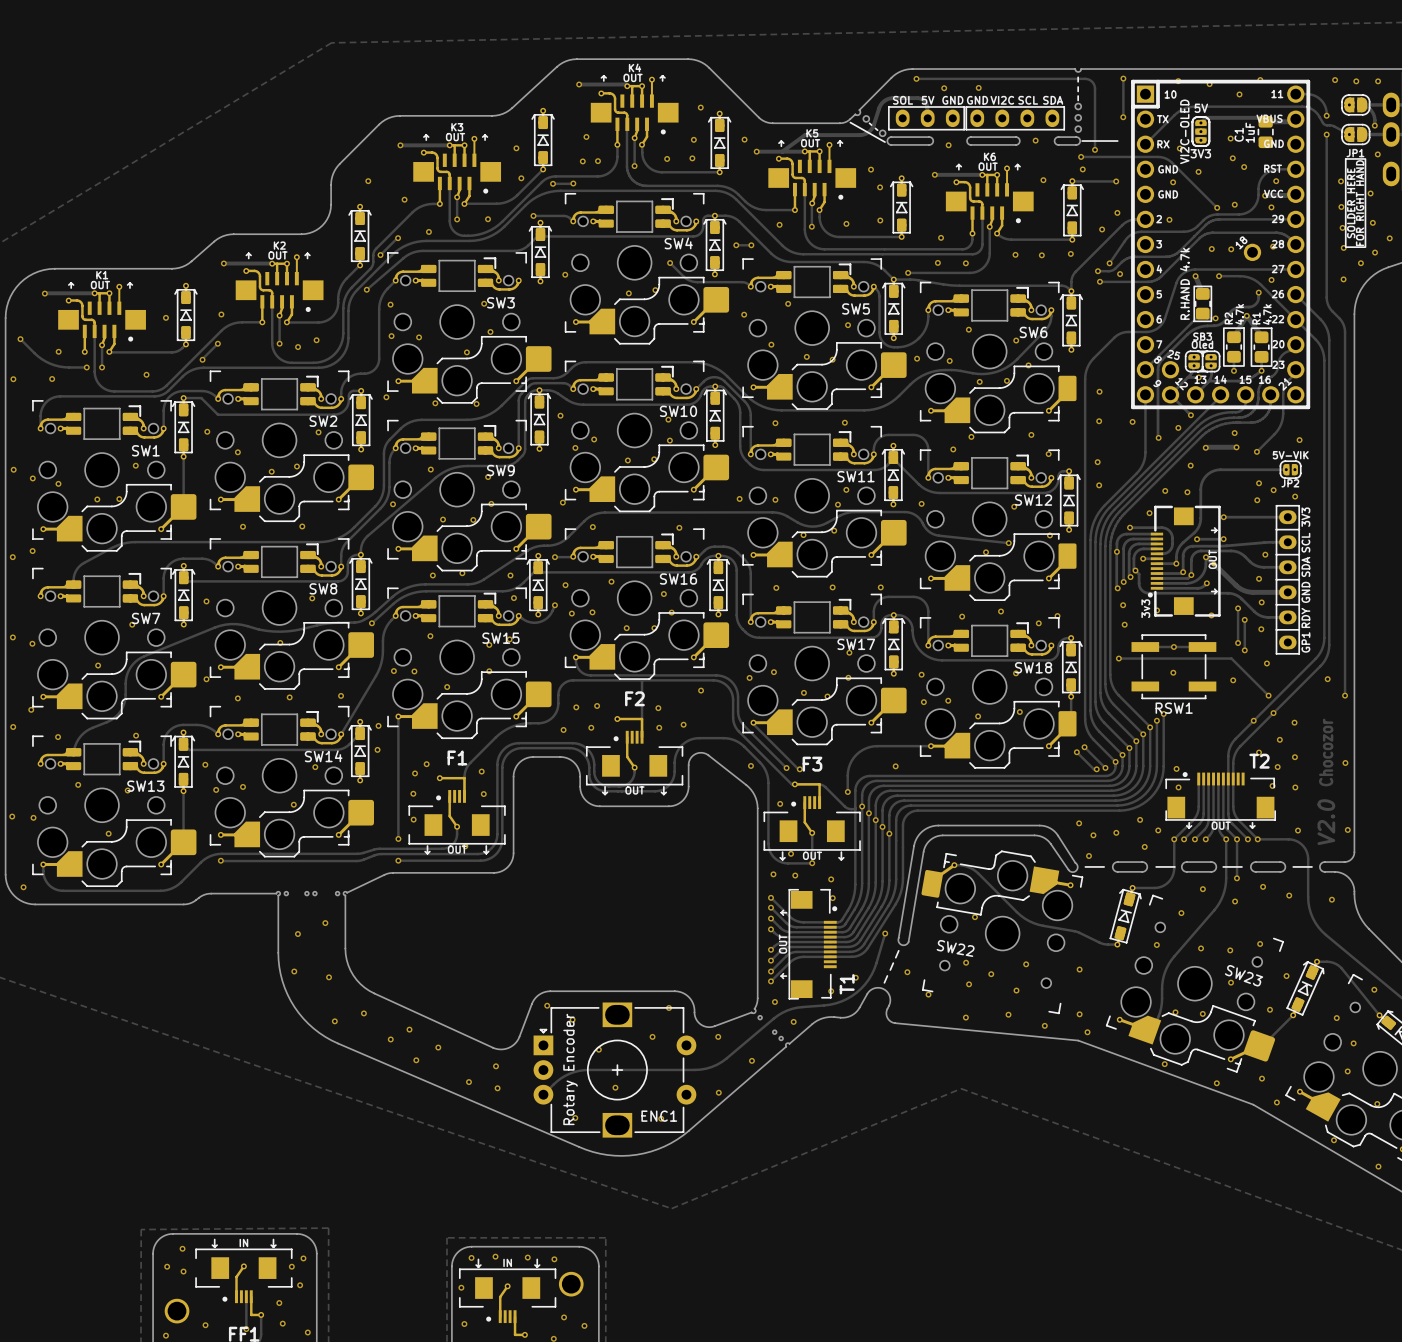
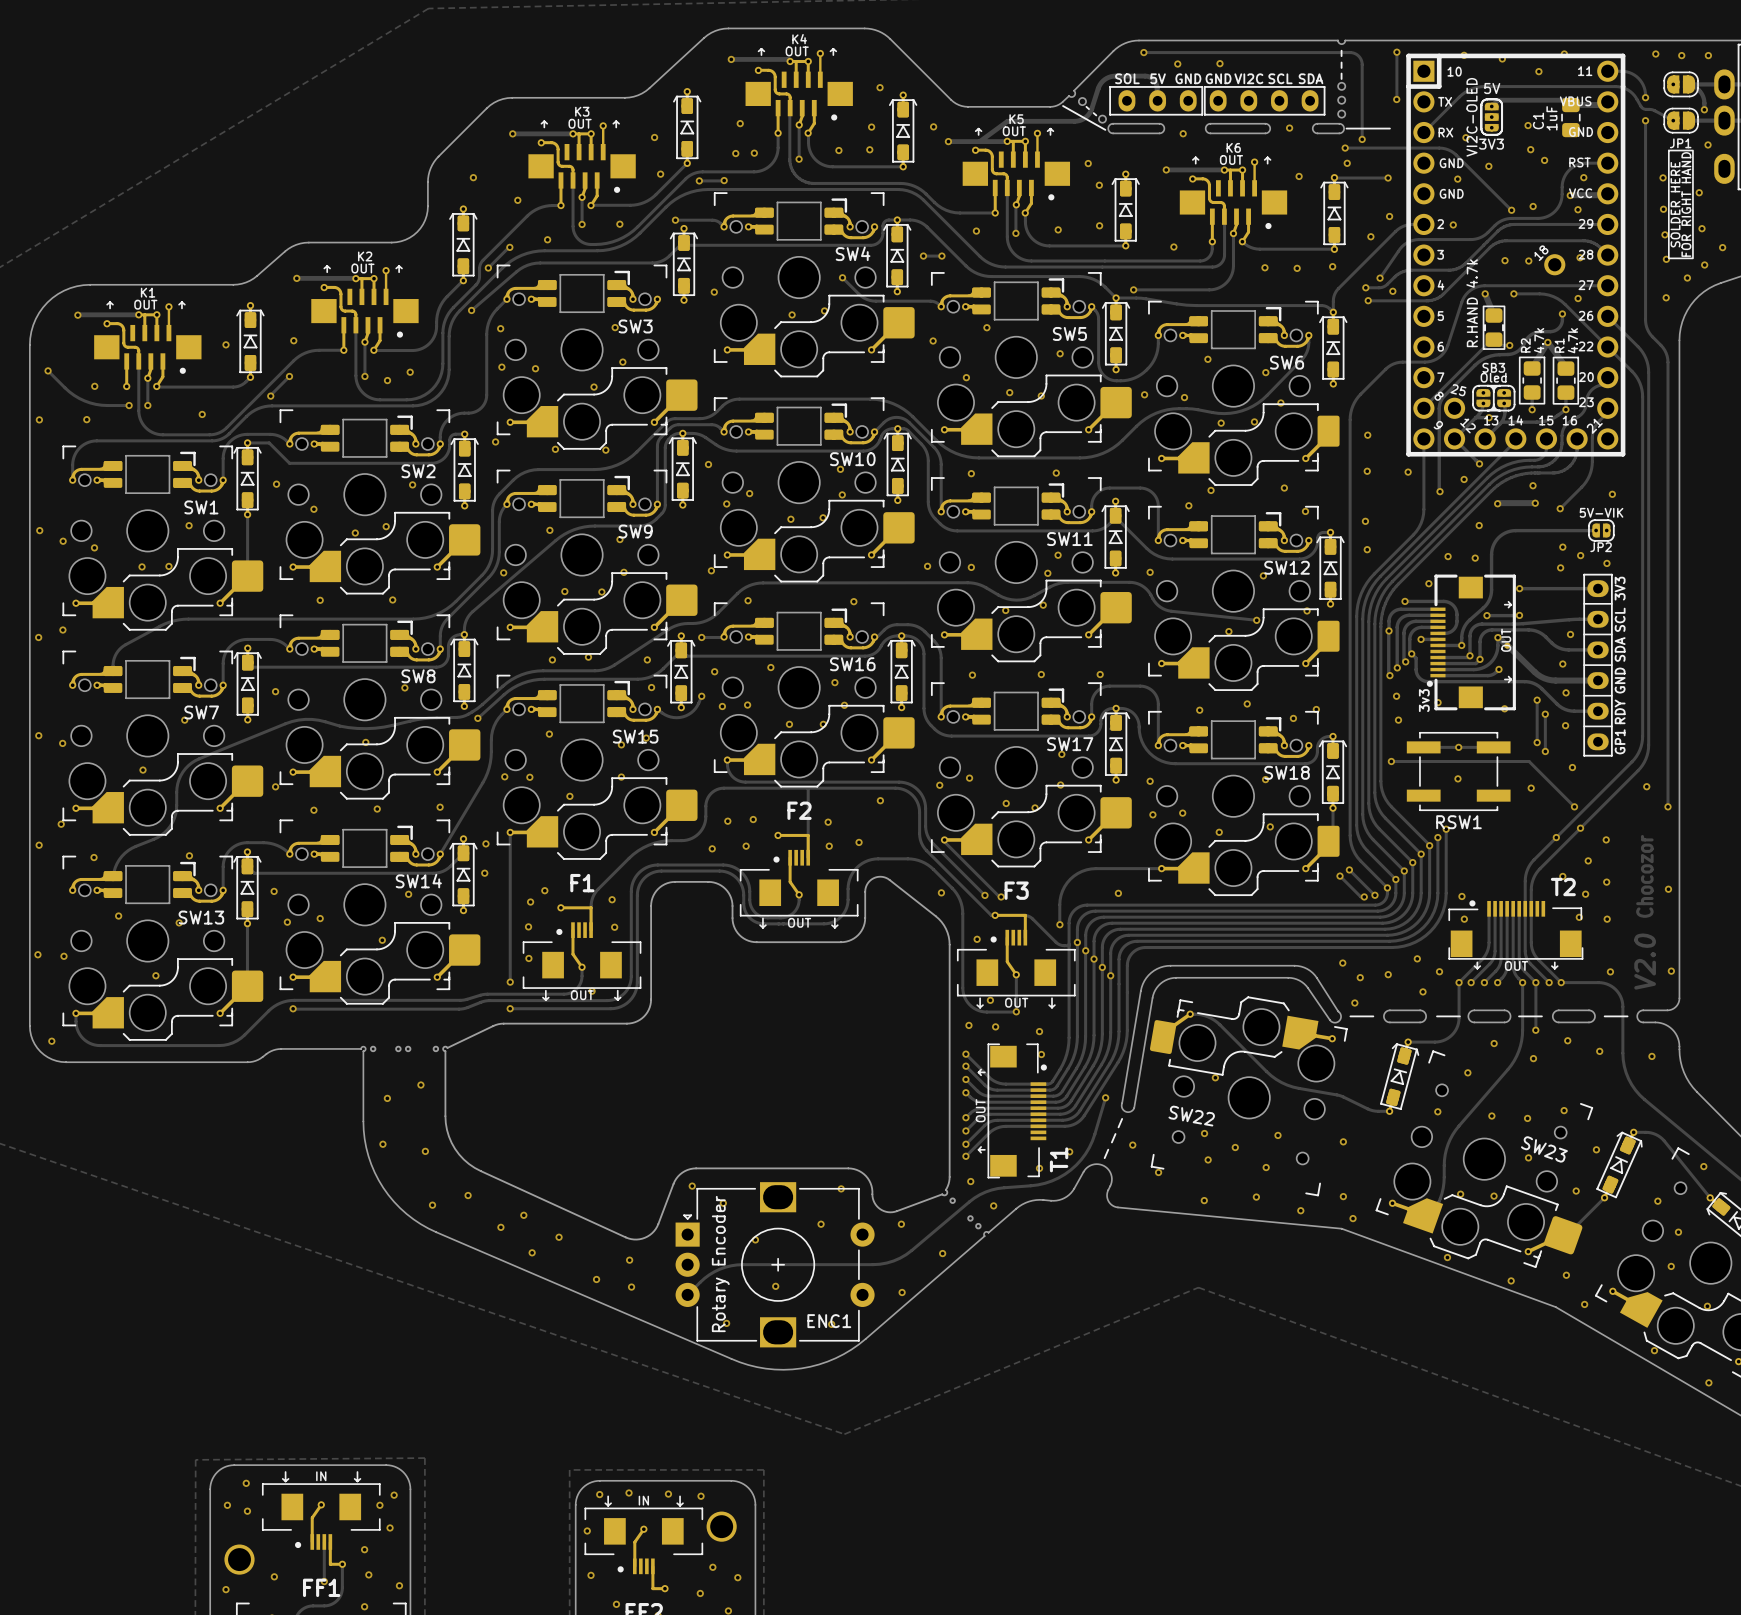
via: (937, 262) -> none
via: (965, 263) -> none

